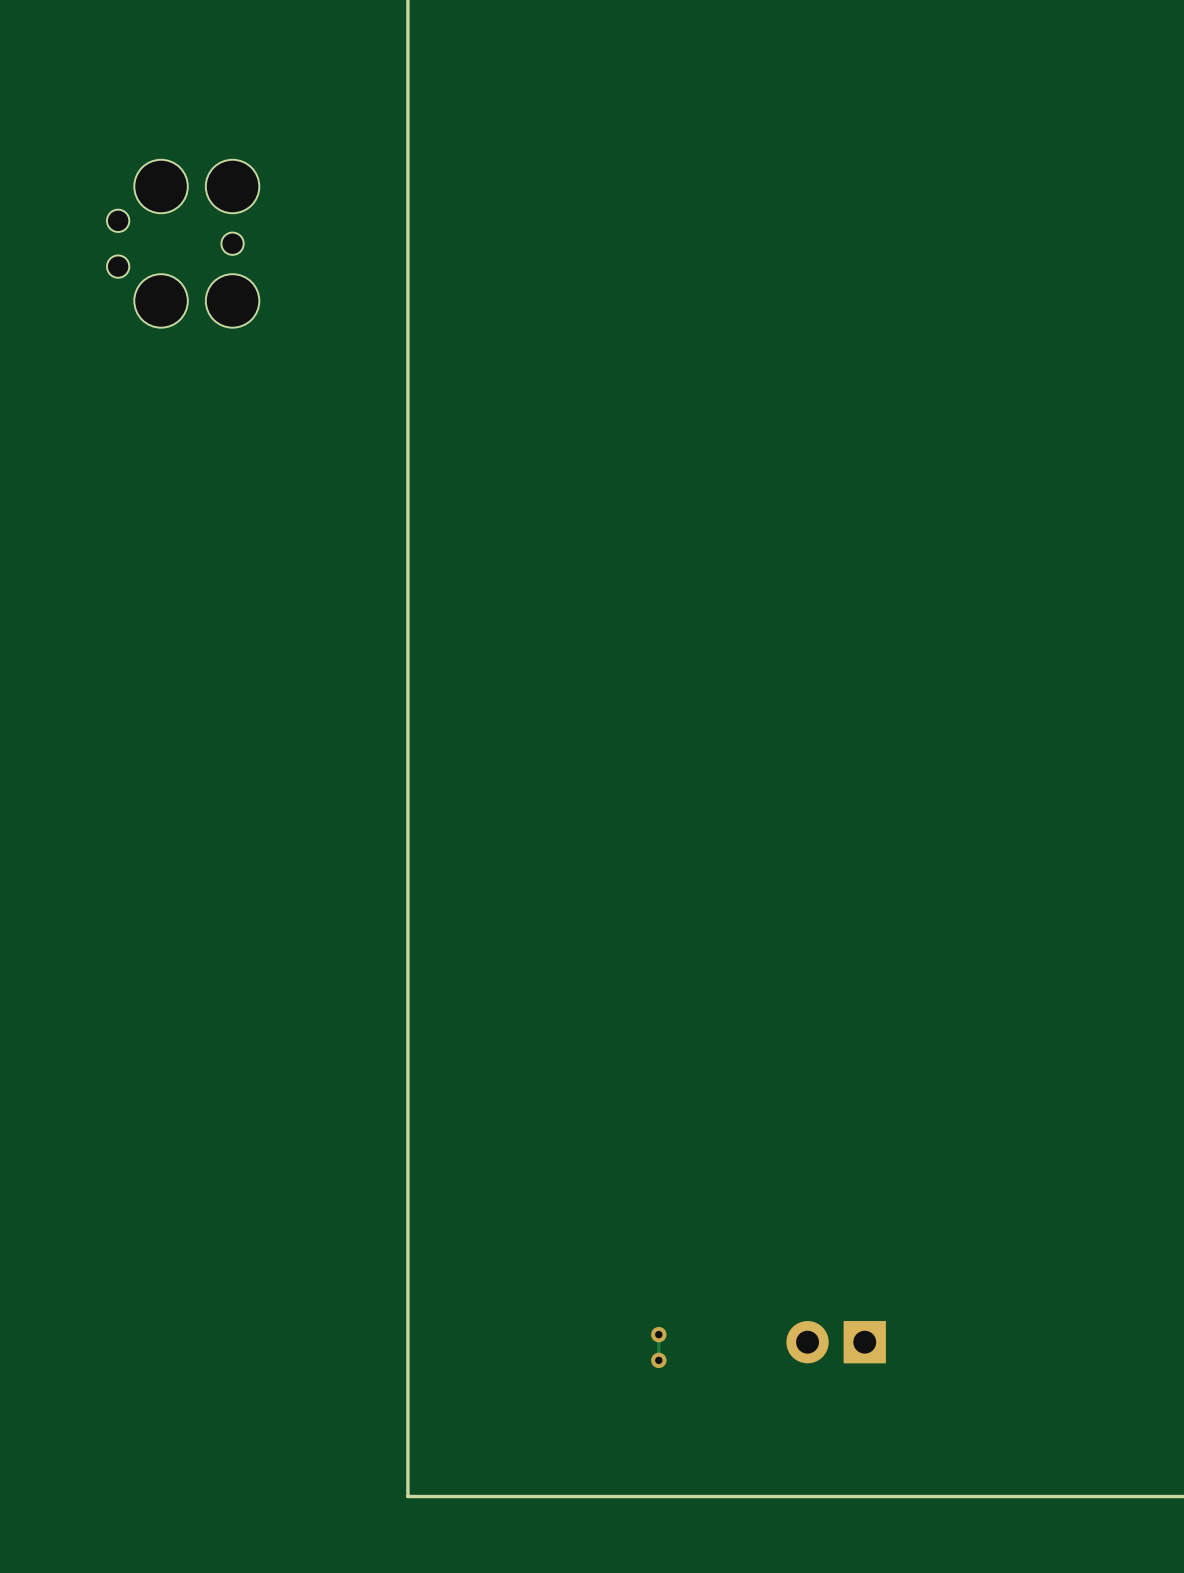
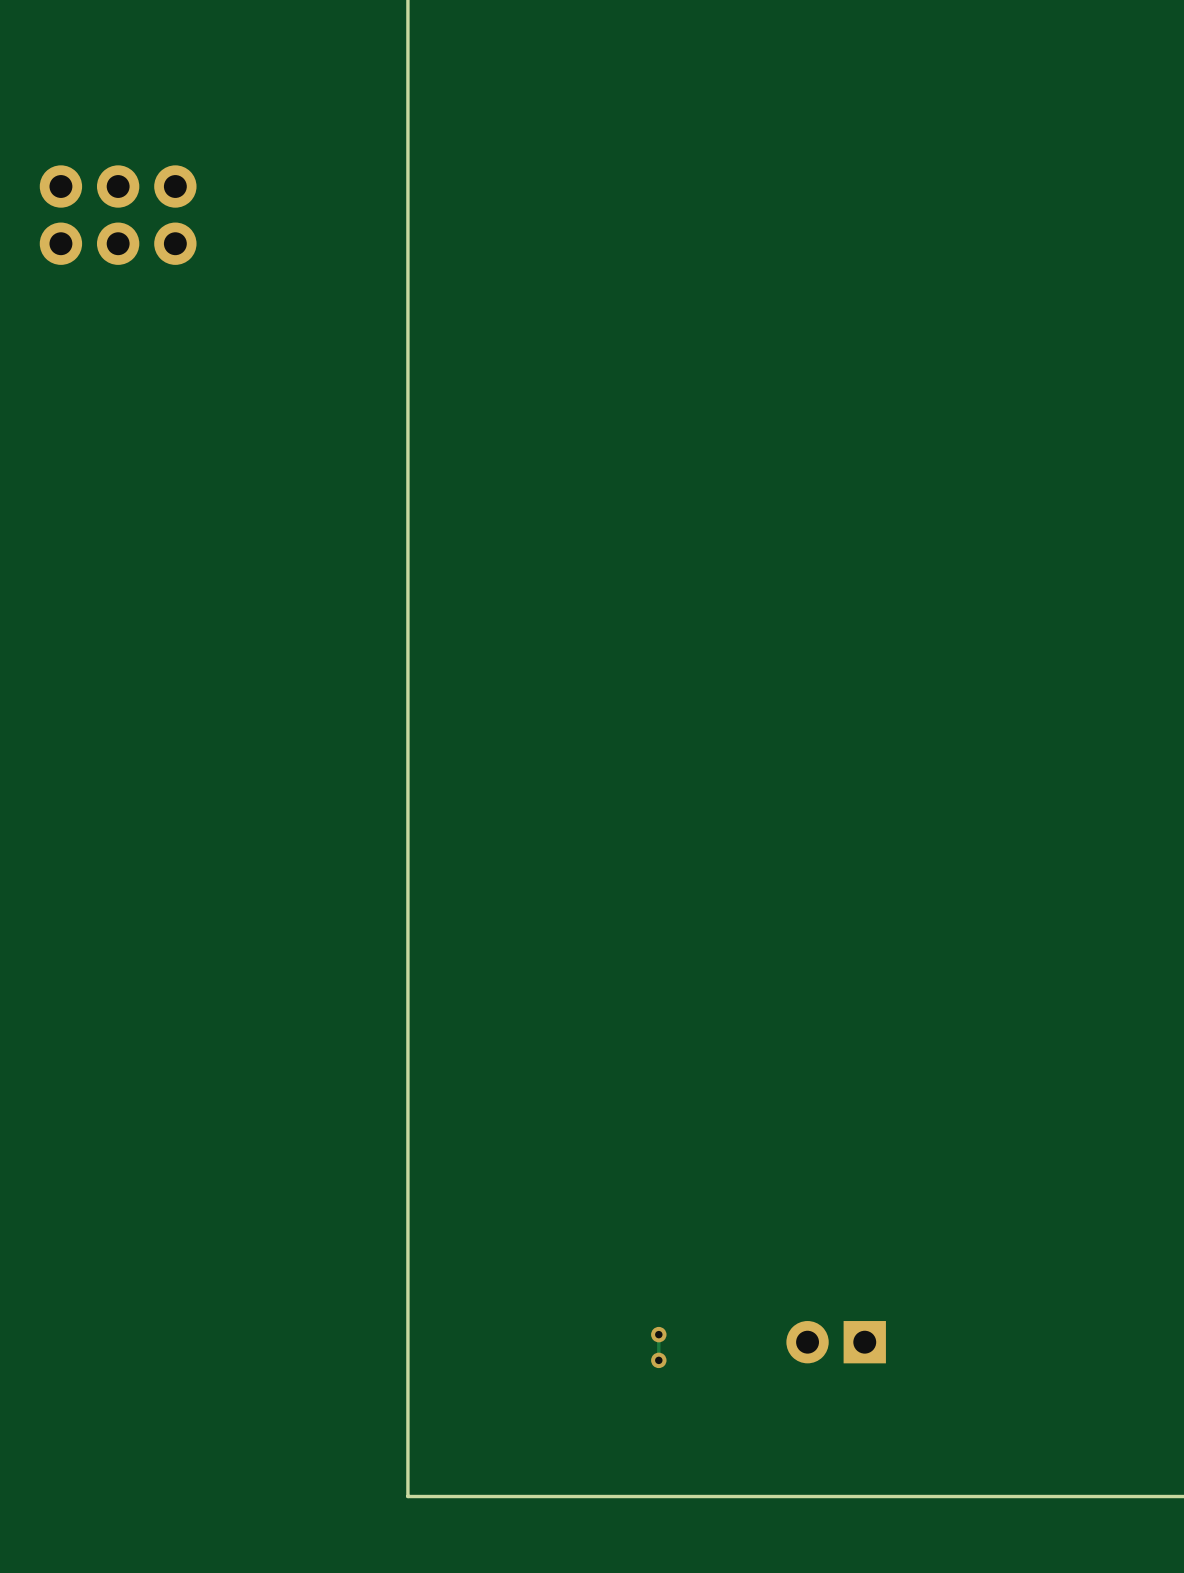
part: none -> (118, 215)
part: (183, 243) -> none

